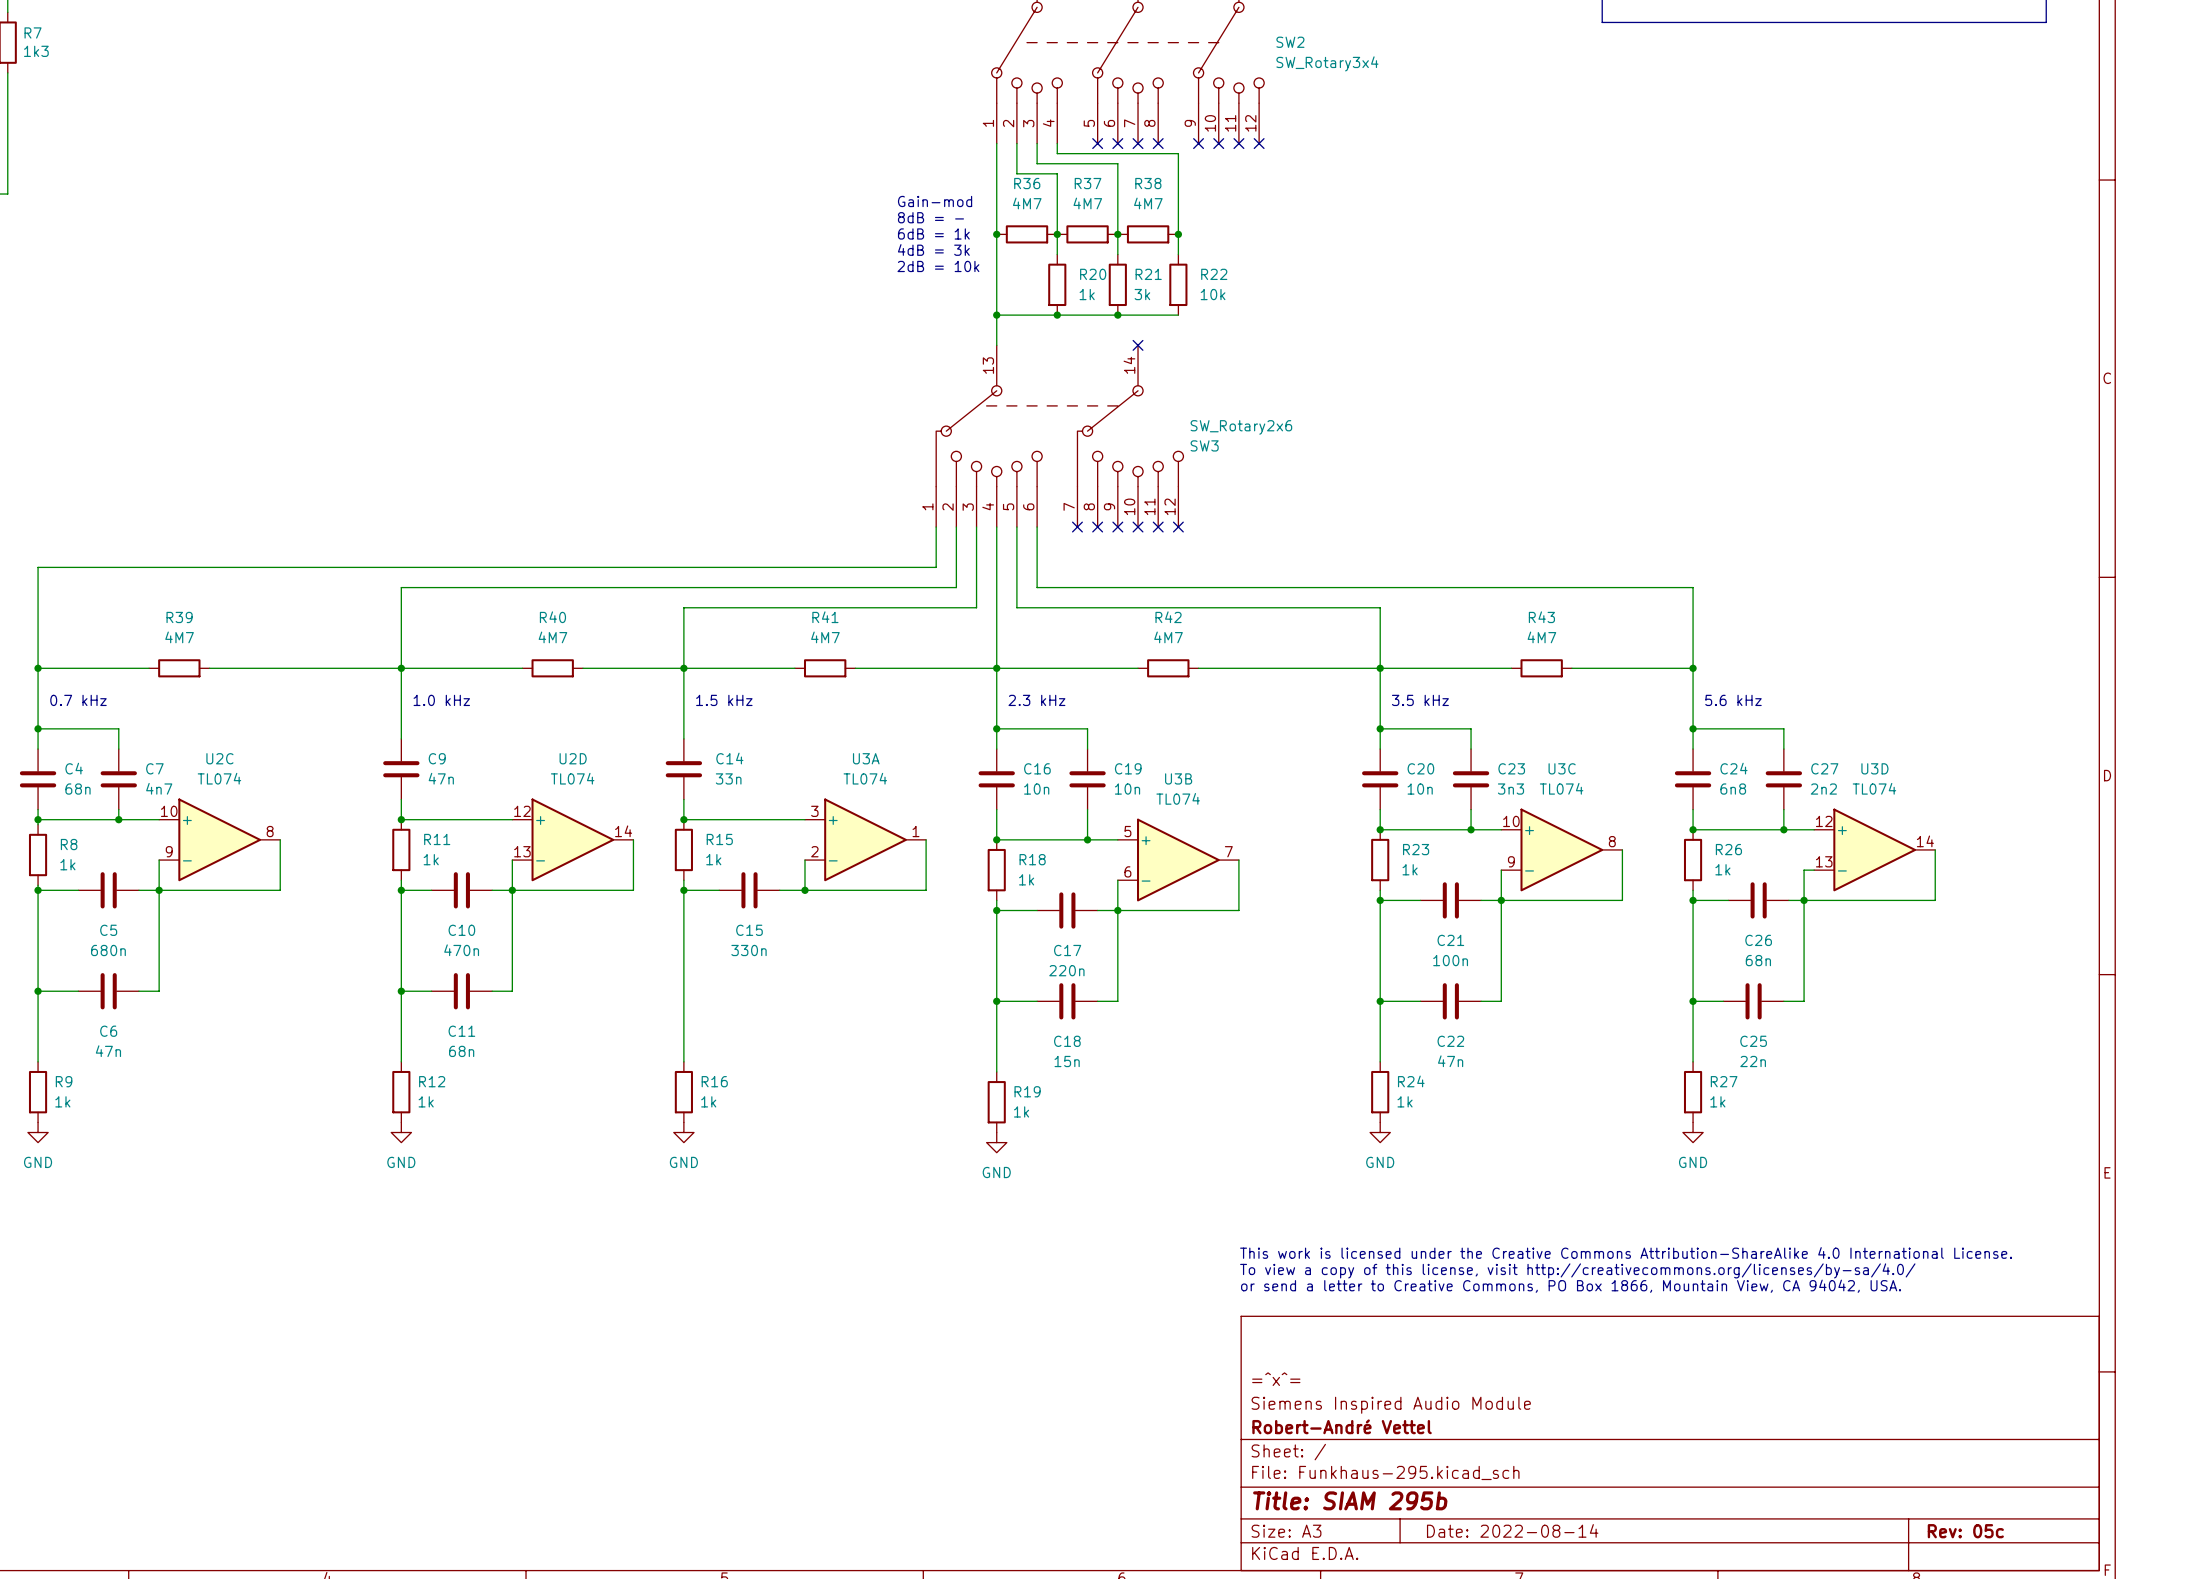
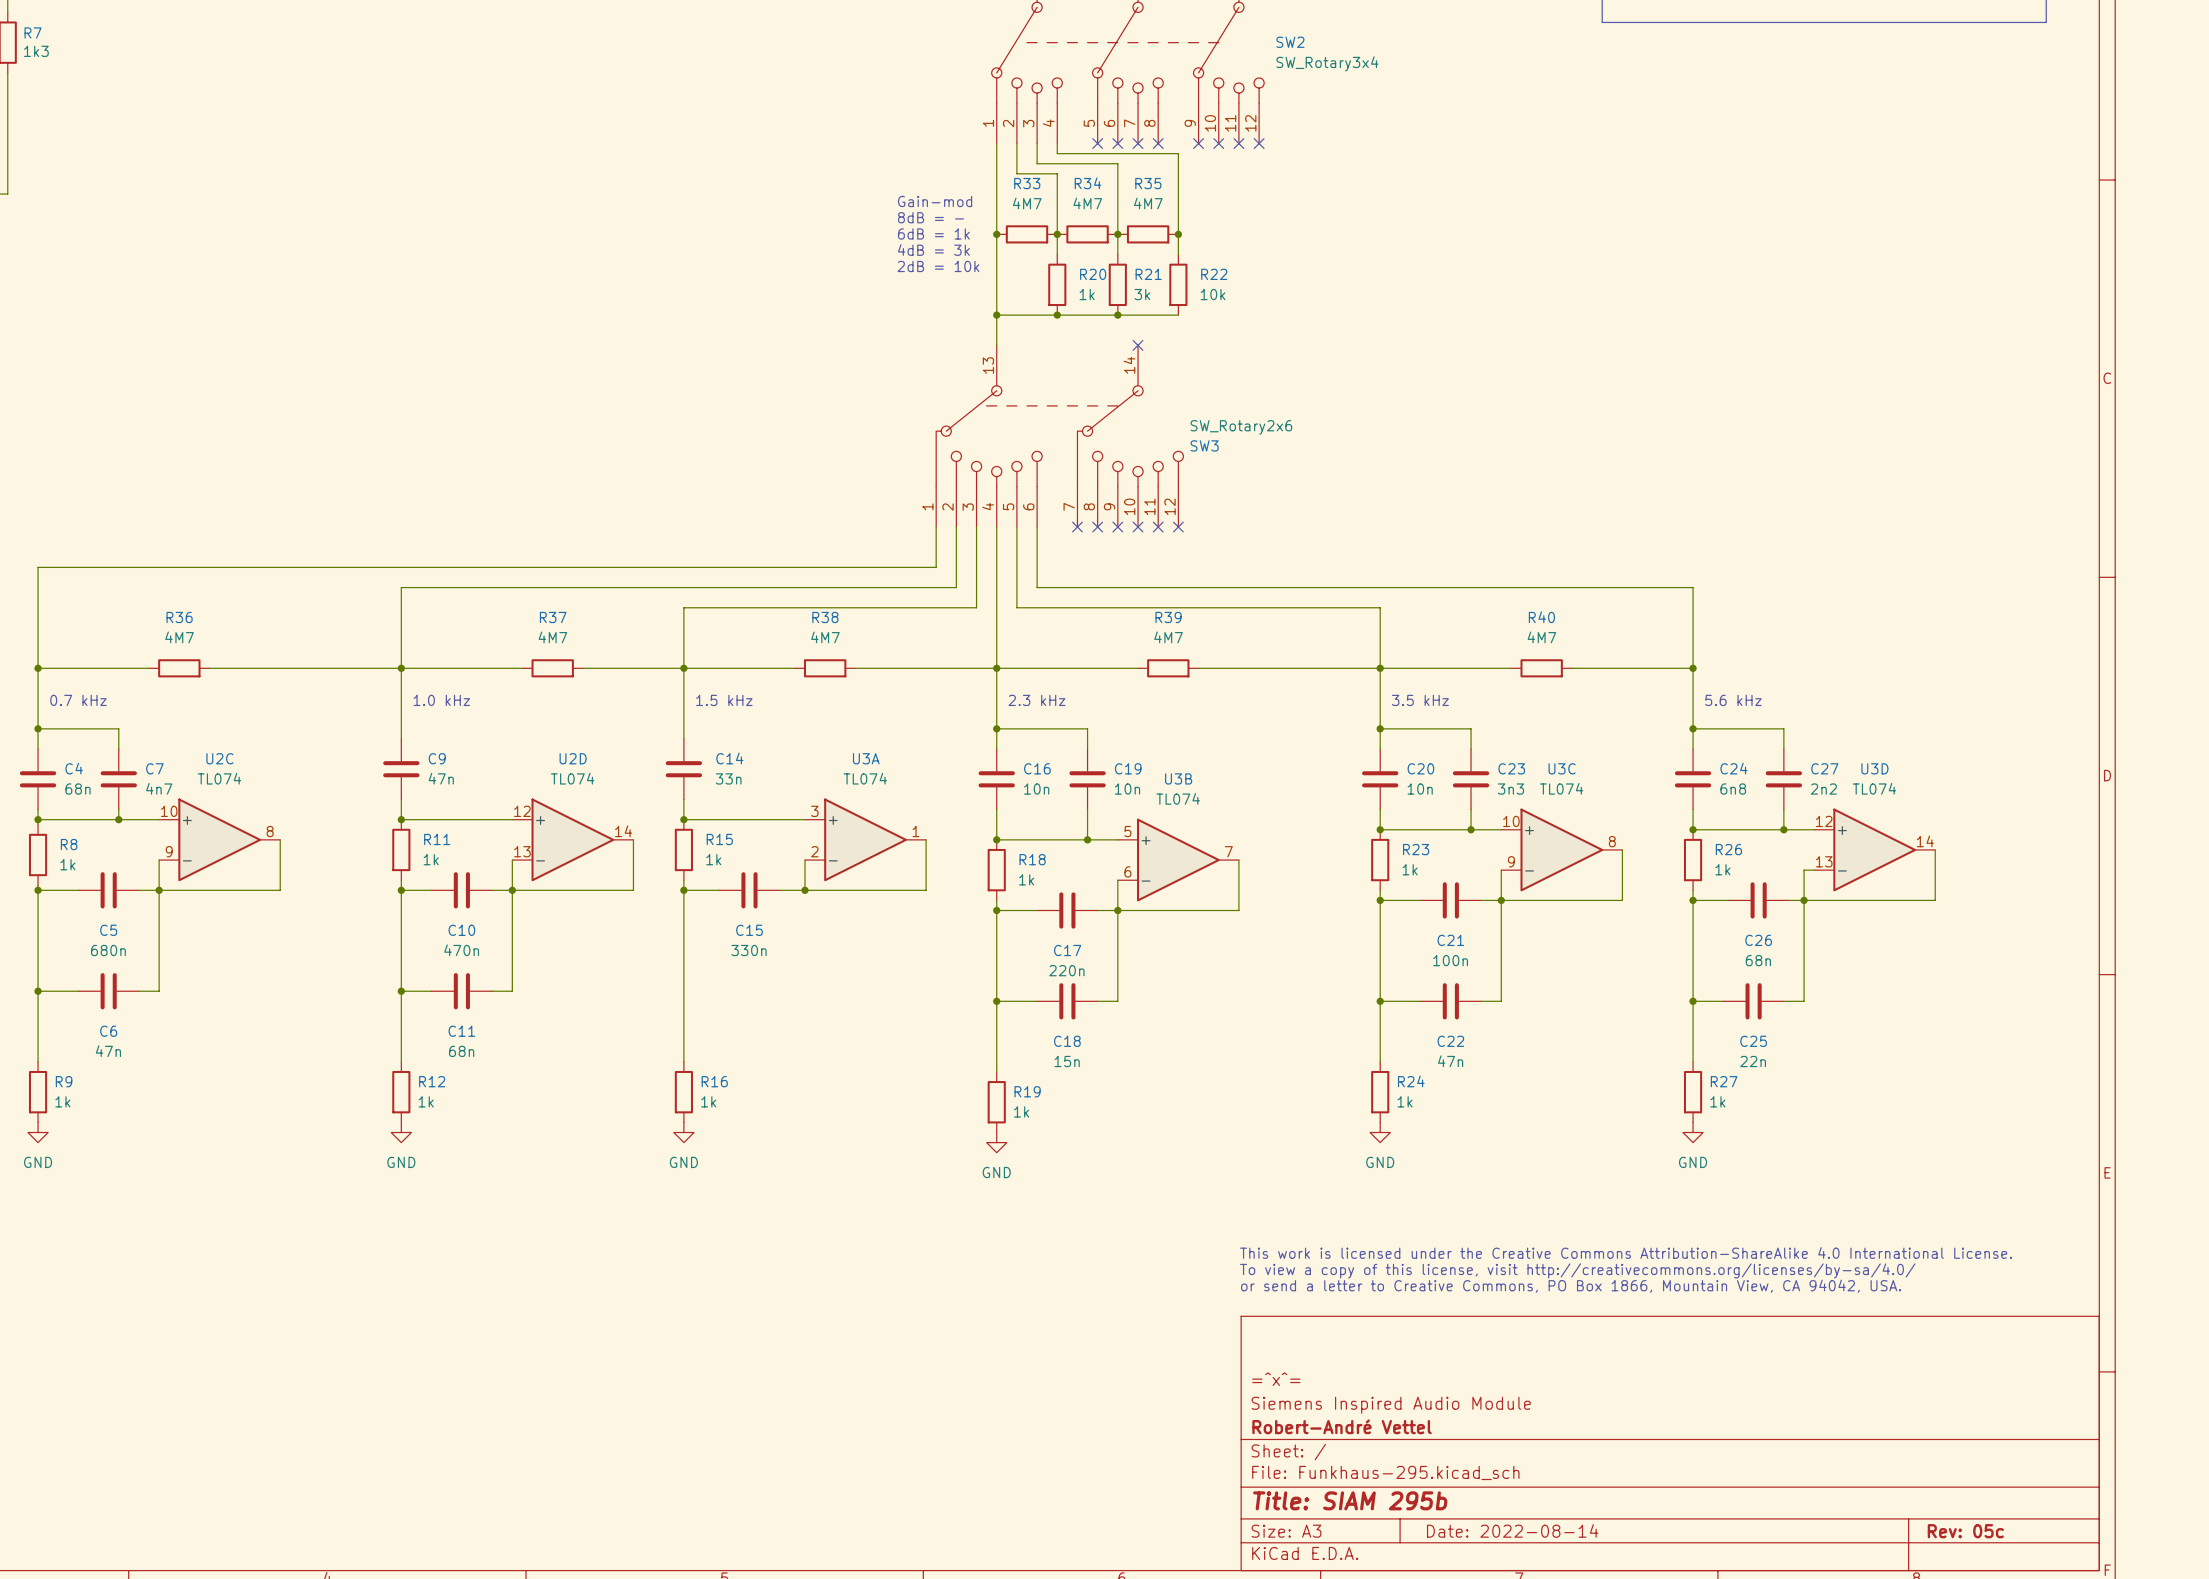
R36 name: R36 (1027, 183) -> R33 (1027, 183)
R37 name: R37 (1088, 183) -> R34 (1088, 183)
R38 name: R38 (1148, 183) -> R35 (1148, 183)
R39 name: R39 (179, 617) -> R36 (179, 617)
R40 name: R40 (552, 617) -> R37 (553, 617)
R41 name: R41 (825, 617) -> R38 (825, 617)
R42 name: R42 (1168, 617) -> R39 (1168, 617)
R43 name: R43 (1541, 617) -> R40 (1541, 617)

